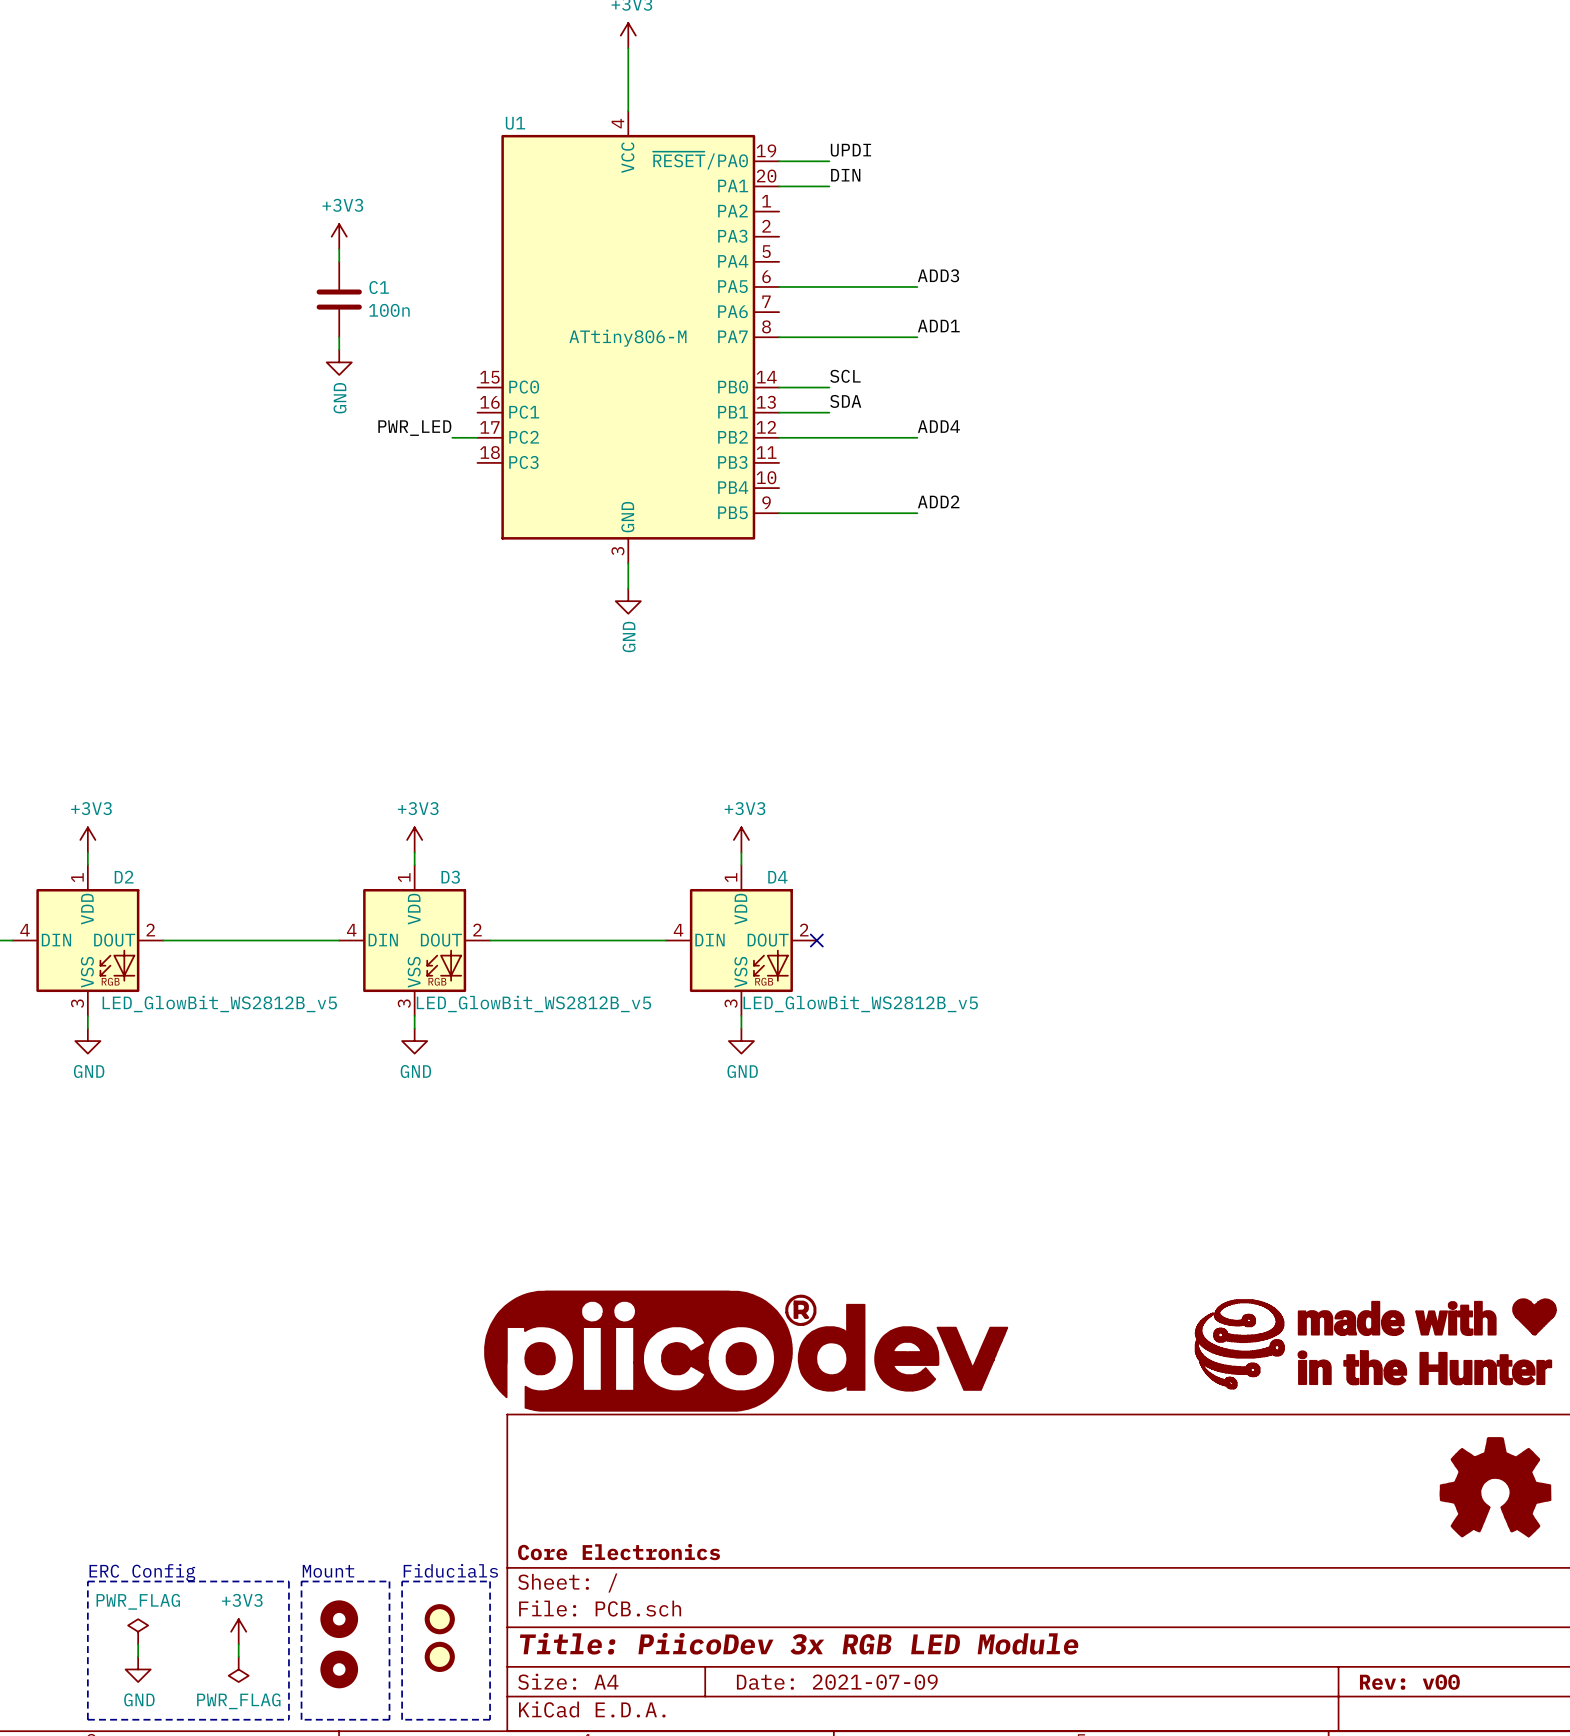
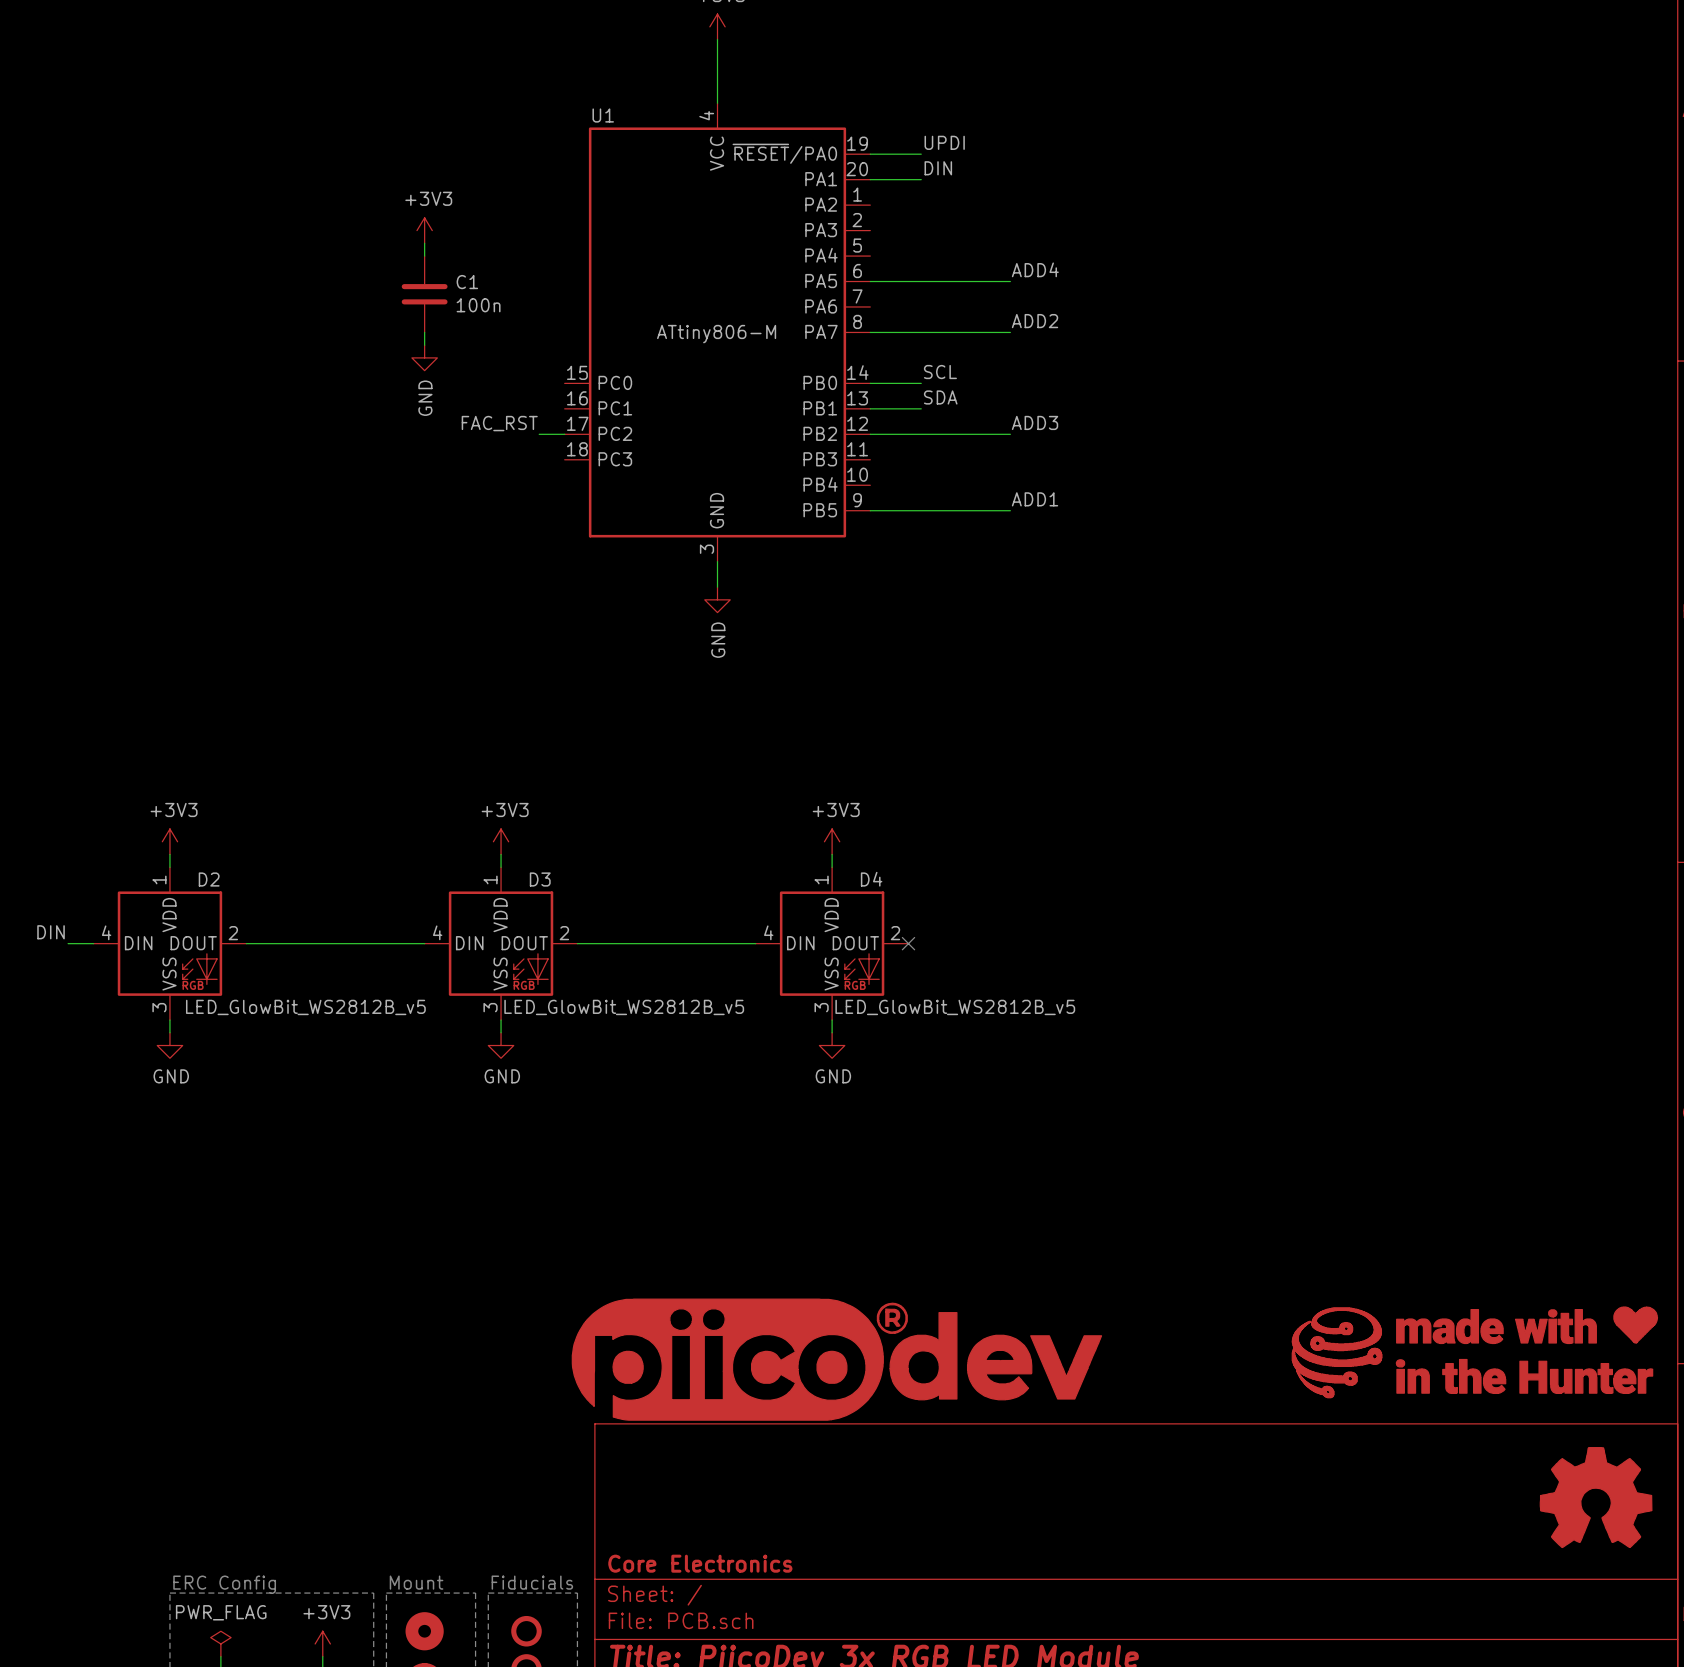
label: ADD3 (938, 275) -> ADD4 (1035, 269)
label: ADD1 (938, 326) -> ADD2 (1035, 321)
label: ADD4 (938, 426) -> ADD3 (1035, 422)
label: PWR_LED (414, 428) -> FAC_RST (499, 423)
label: ADD2 (938, 501) -> ADD1 (1035, 499)

